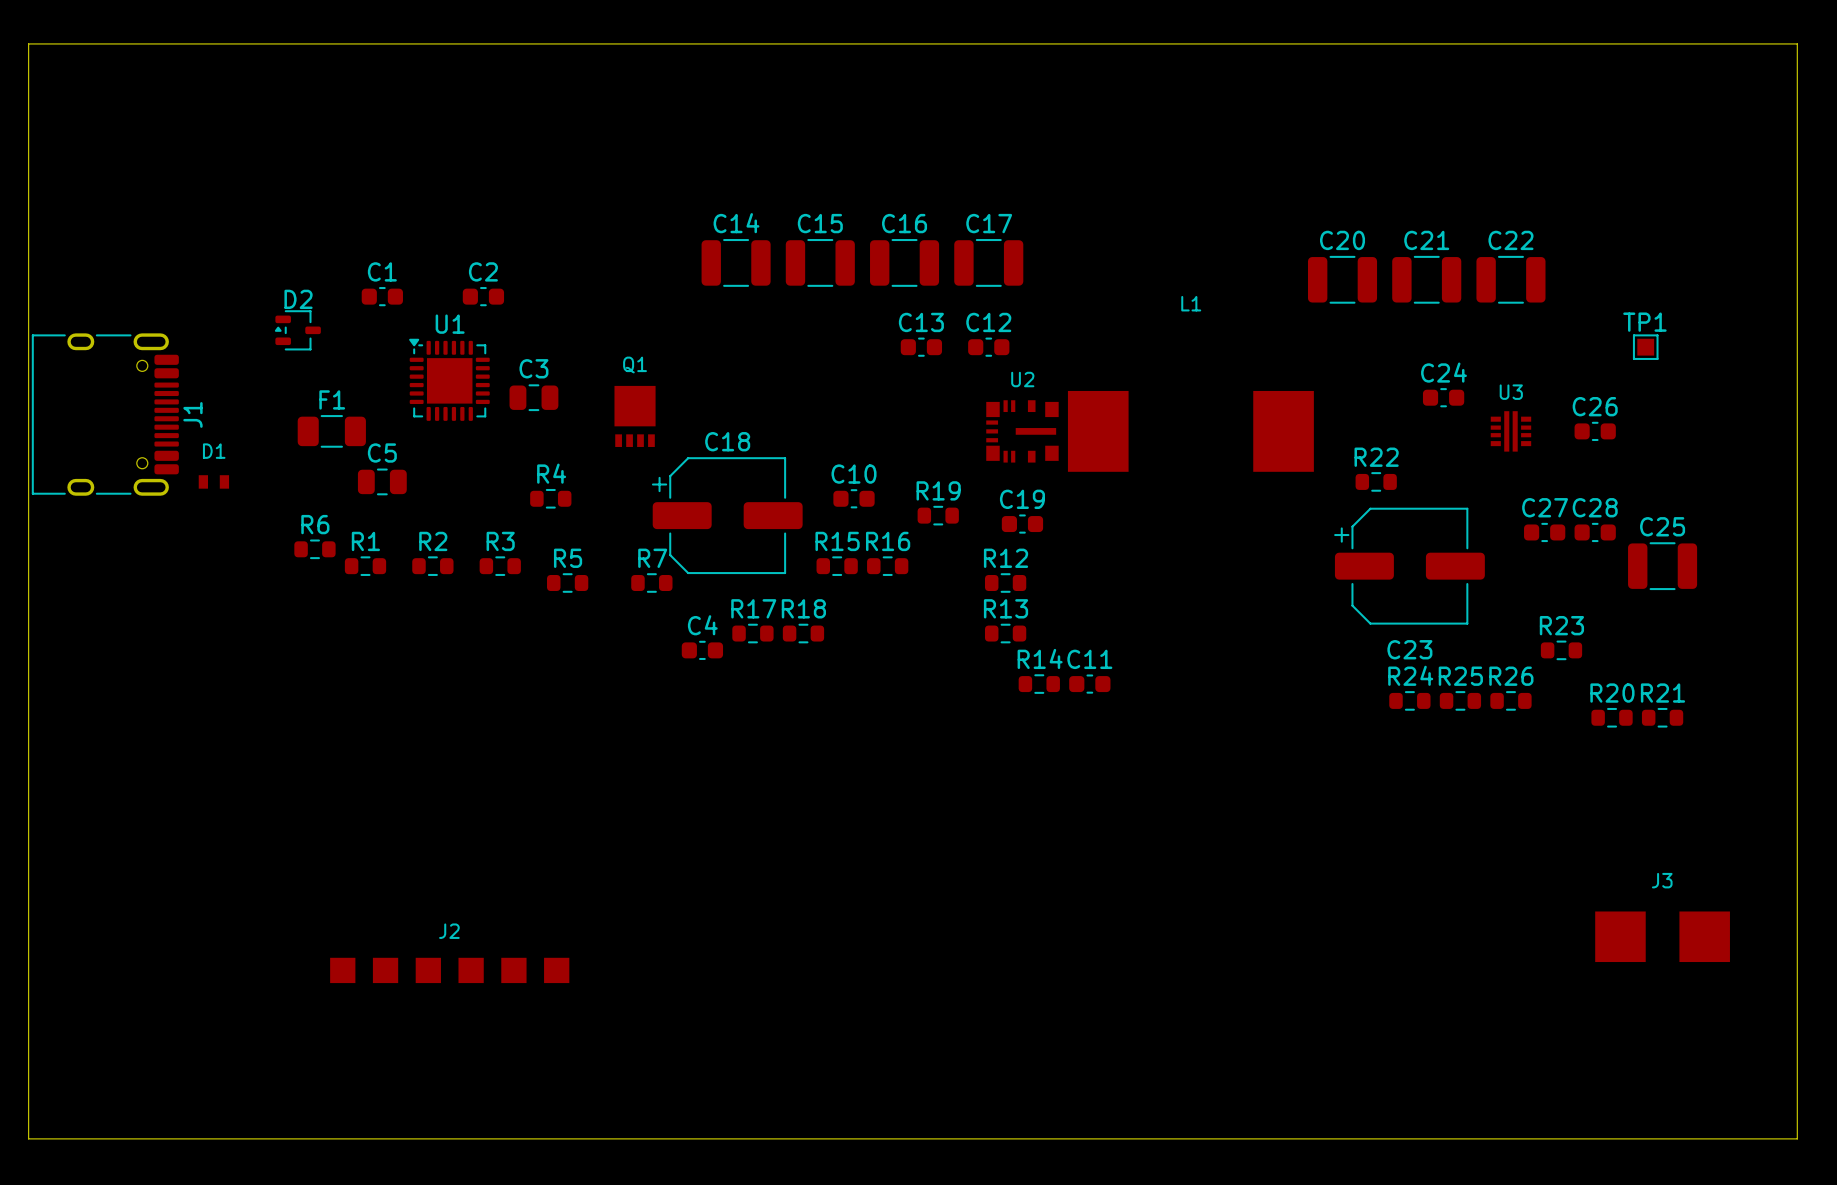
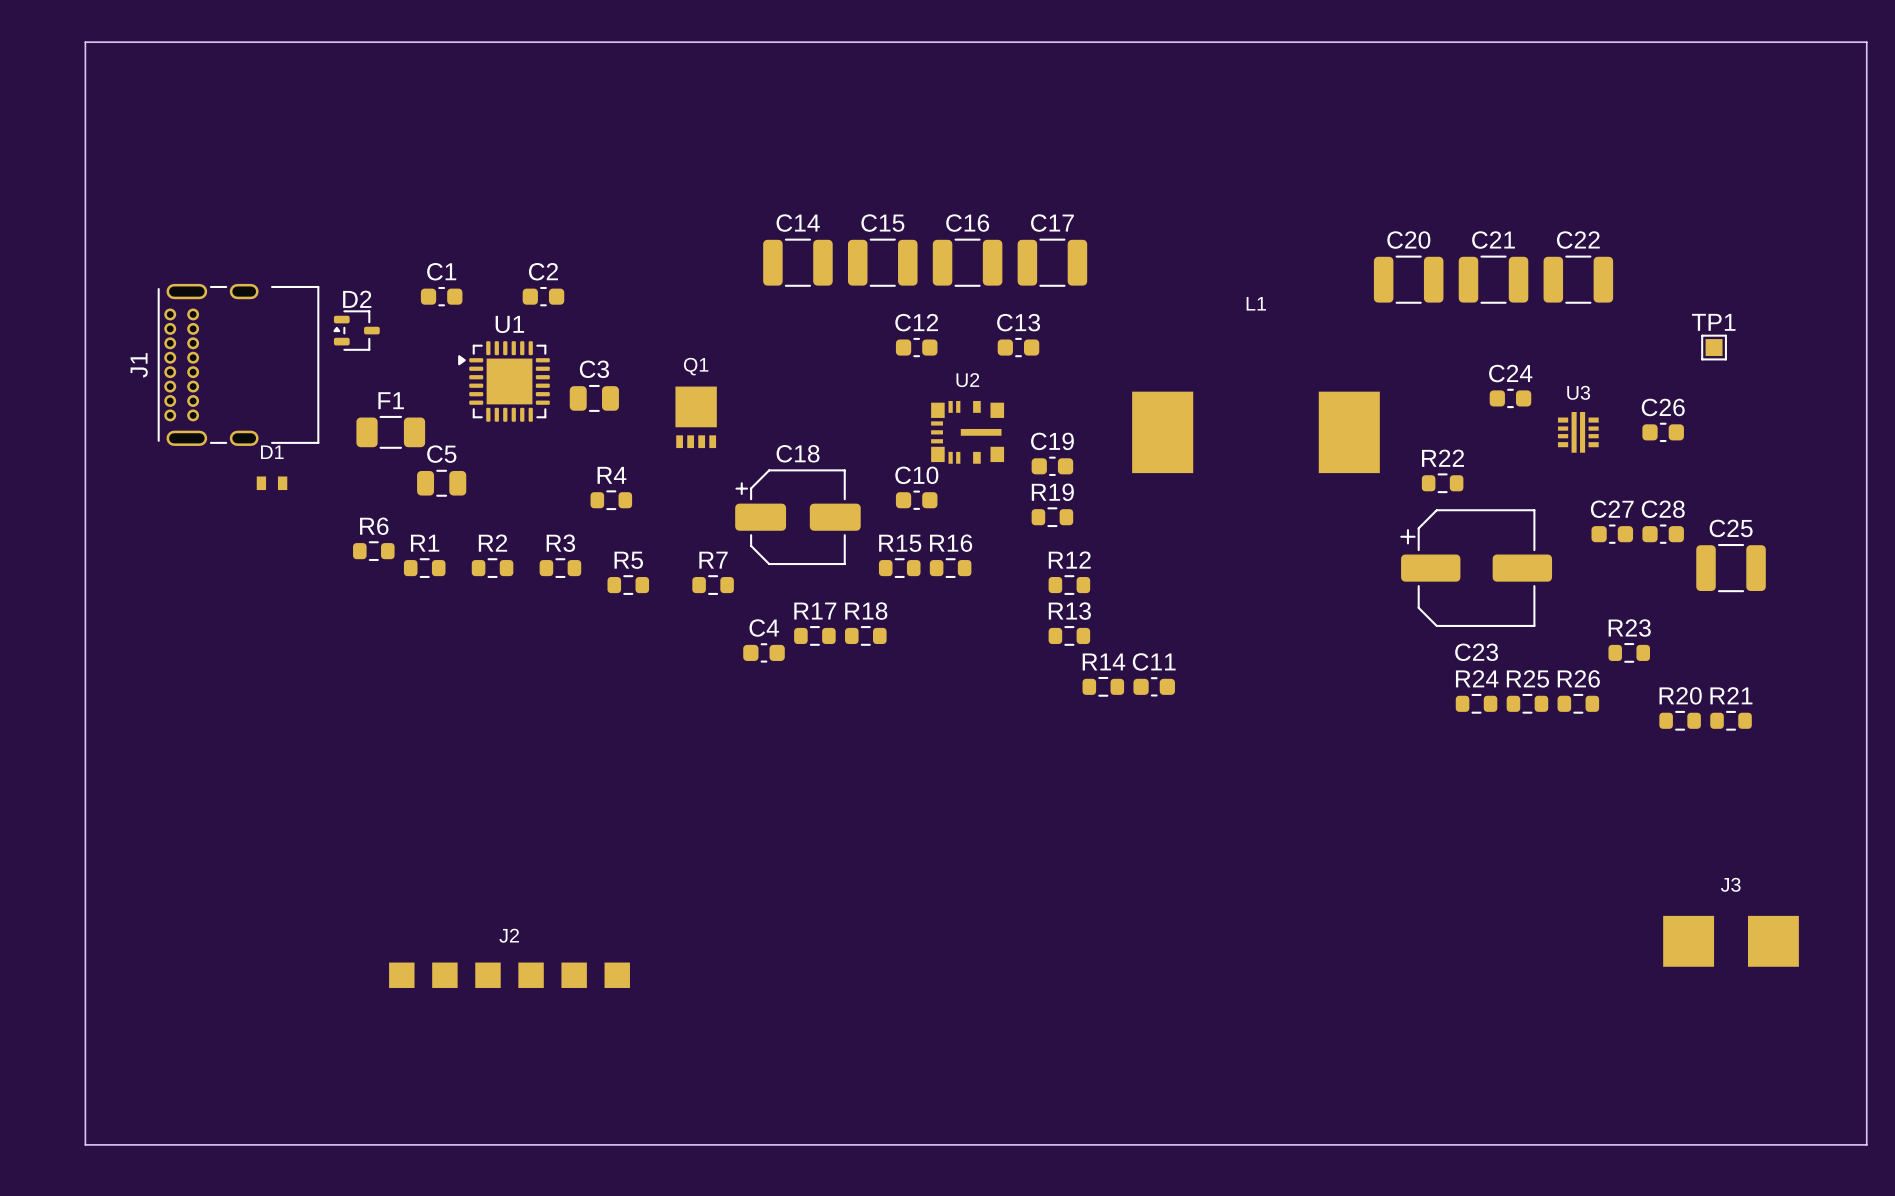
J1 footprint: [31, 333, 179, 496] -> [157, 283, 320, 446]
U1 footprint: [409, 338, 490, 421] -> [458, 341, 550, 422]
C13 position: (921, 347) -> (1018, 347)
C12 position: (988, 347) -> (916, 347)
J1 name position: J1 (192, 414) -> J1 (139, 365)
U2 position: (1022, 431) -> (967, 432)
C18 footprint: [651, 457, 803, 575] -> [735, 469, 861, 566]
R19 position: (938, 515) -> (1052, 517)
C19 position: (1022, 524) -> (1052, 466)

